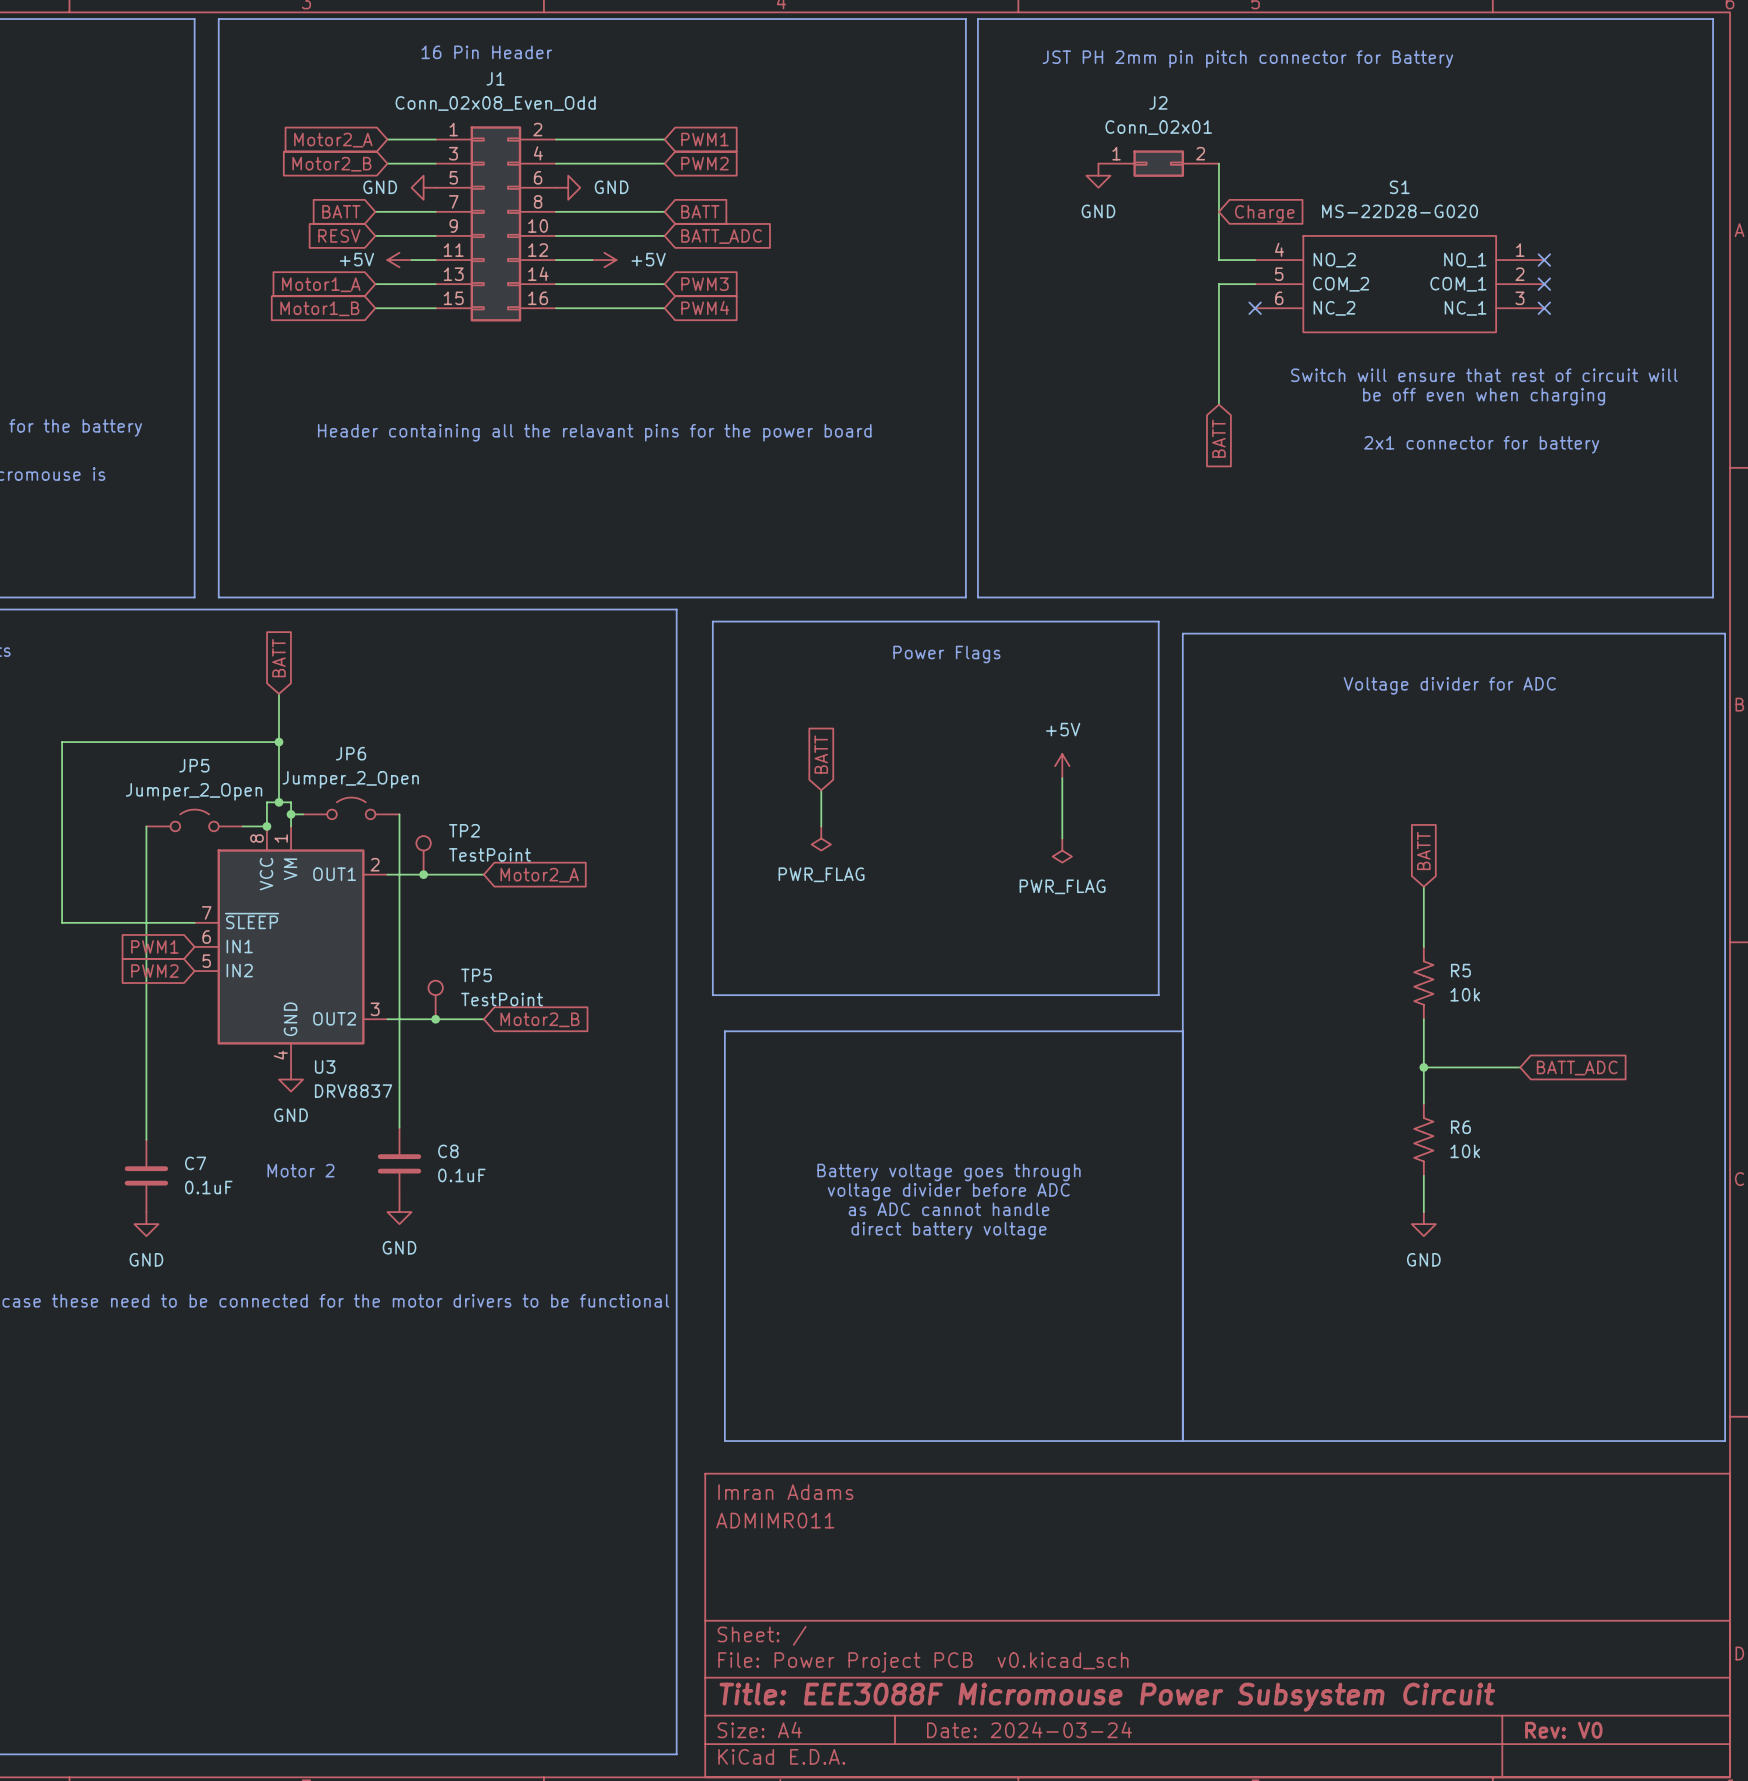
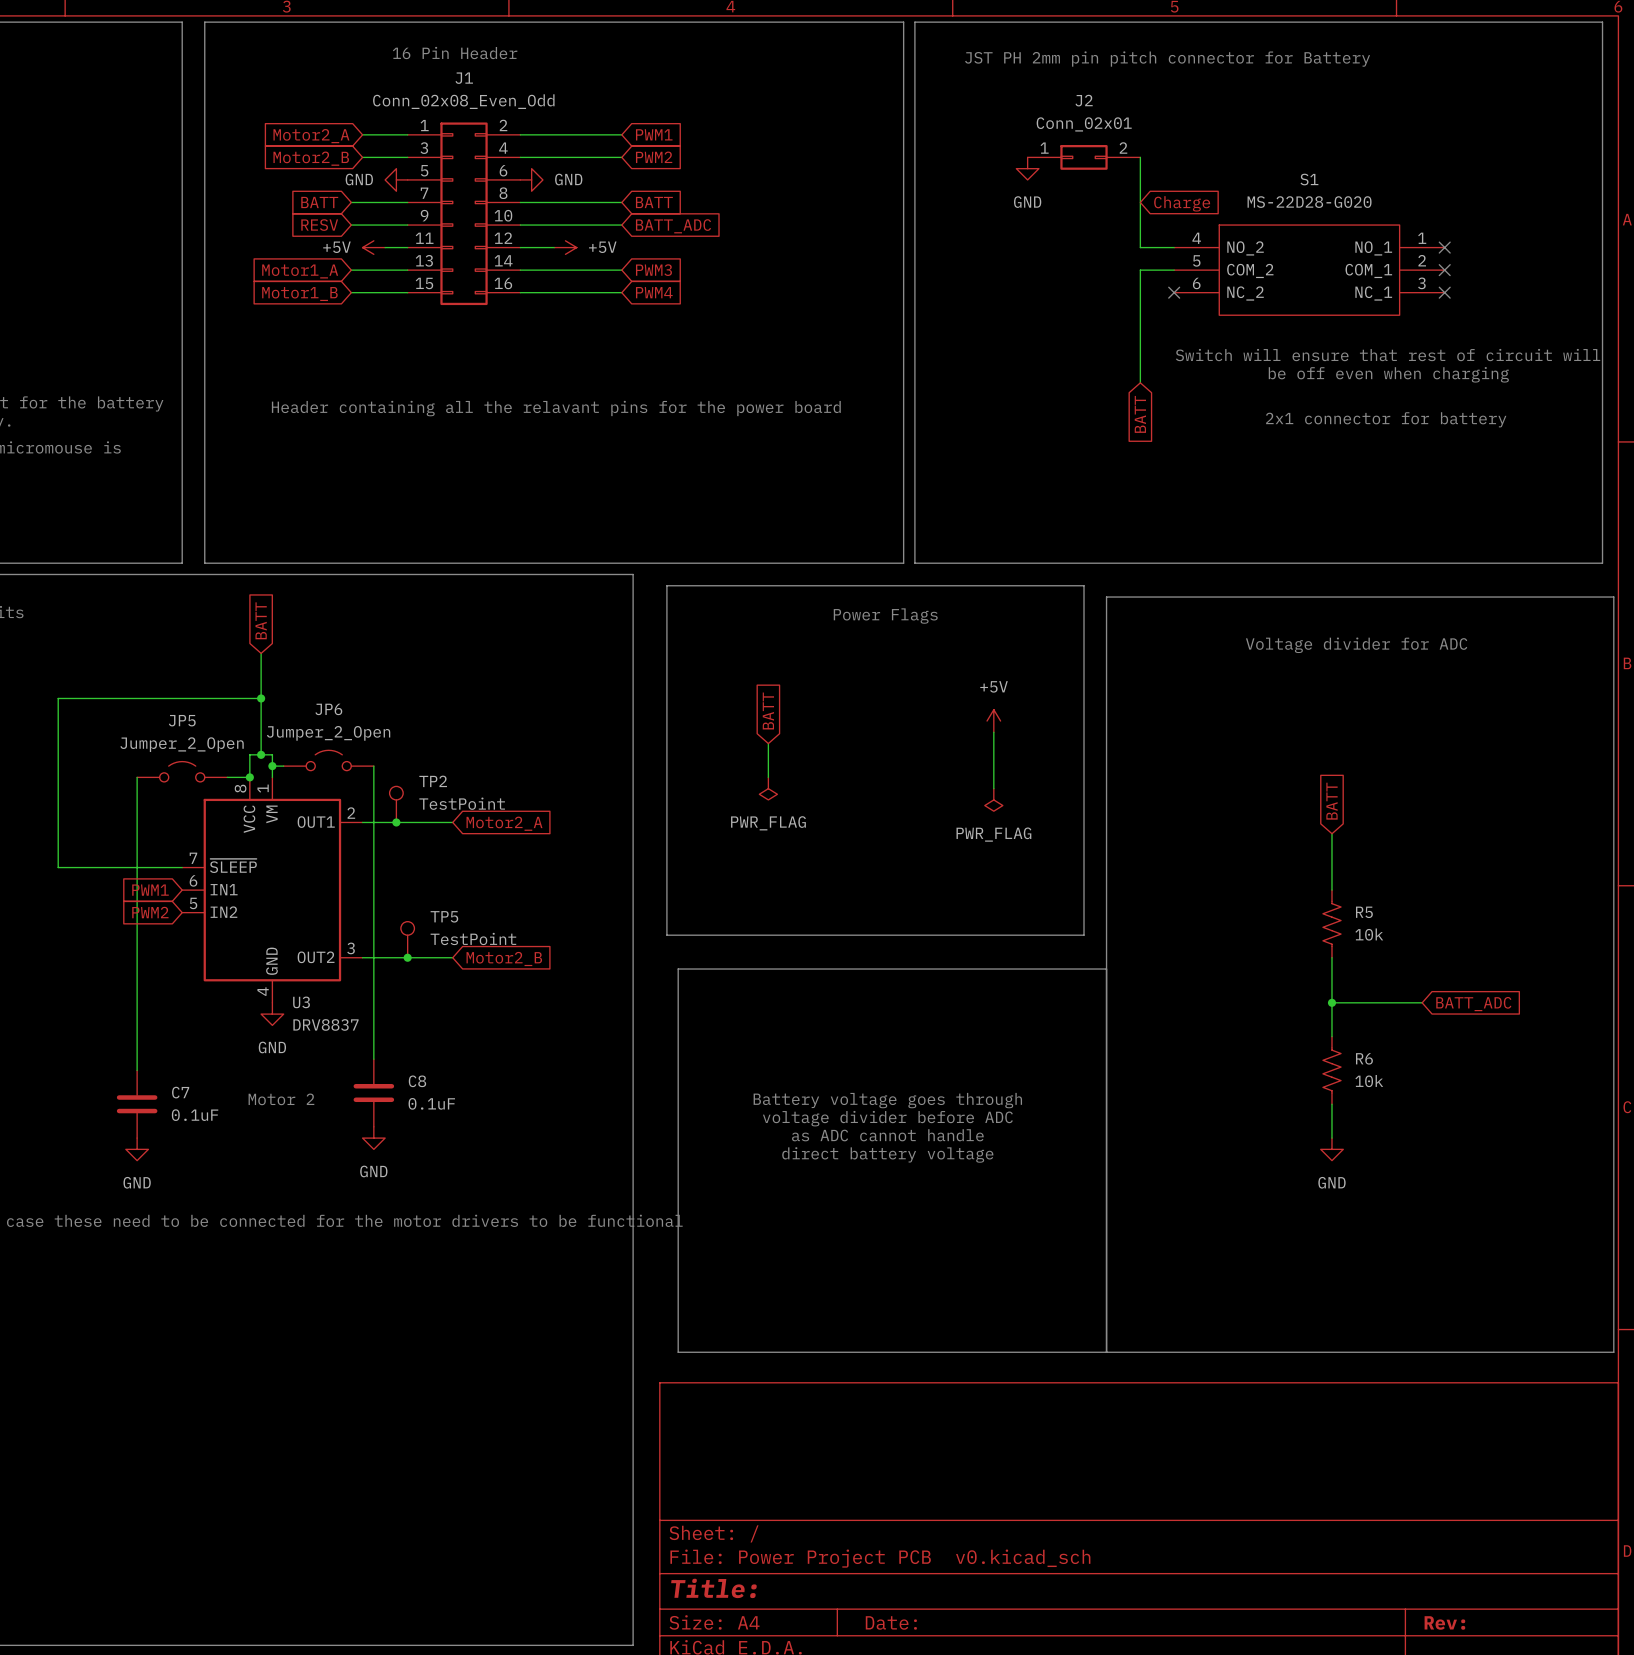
title block: Imran Adams (785, 1492) -> none
title block: ADMIMR011 (775, 1520) -> none
title block: Title: EEE3088F Micromouse Power Subsystem Circuit (1107, 1697) -> Title: (713, 1588)
title block: Date: 2024-03-24 (1029, 1729) -> Date: (891, 1622)
title block: Rev: V0 (1563, 1730) -> Rev: (1444, 1622)

